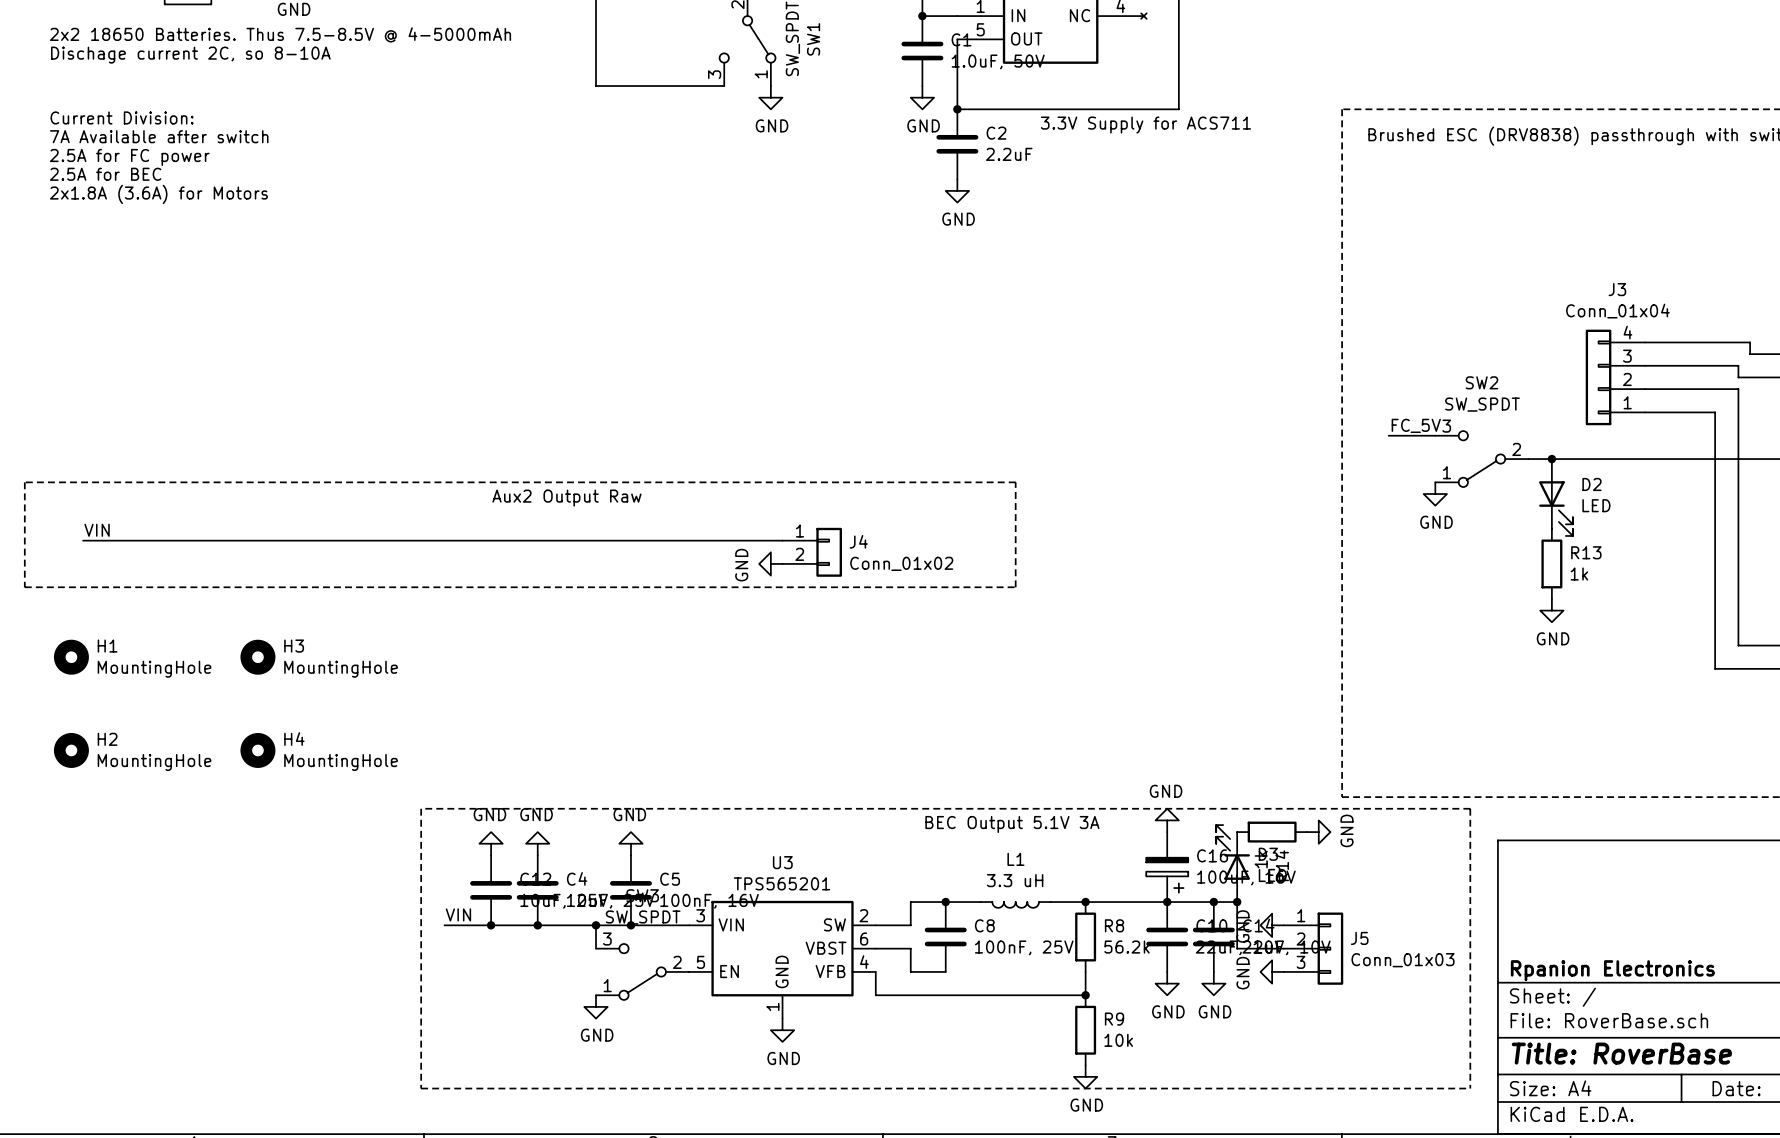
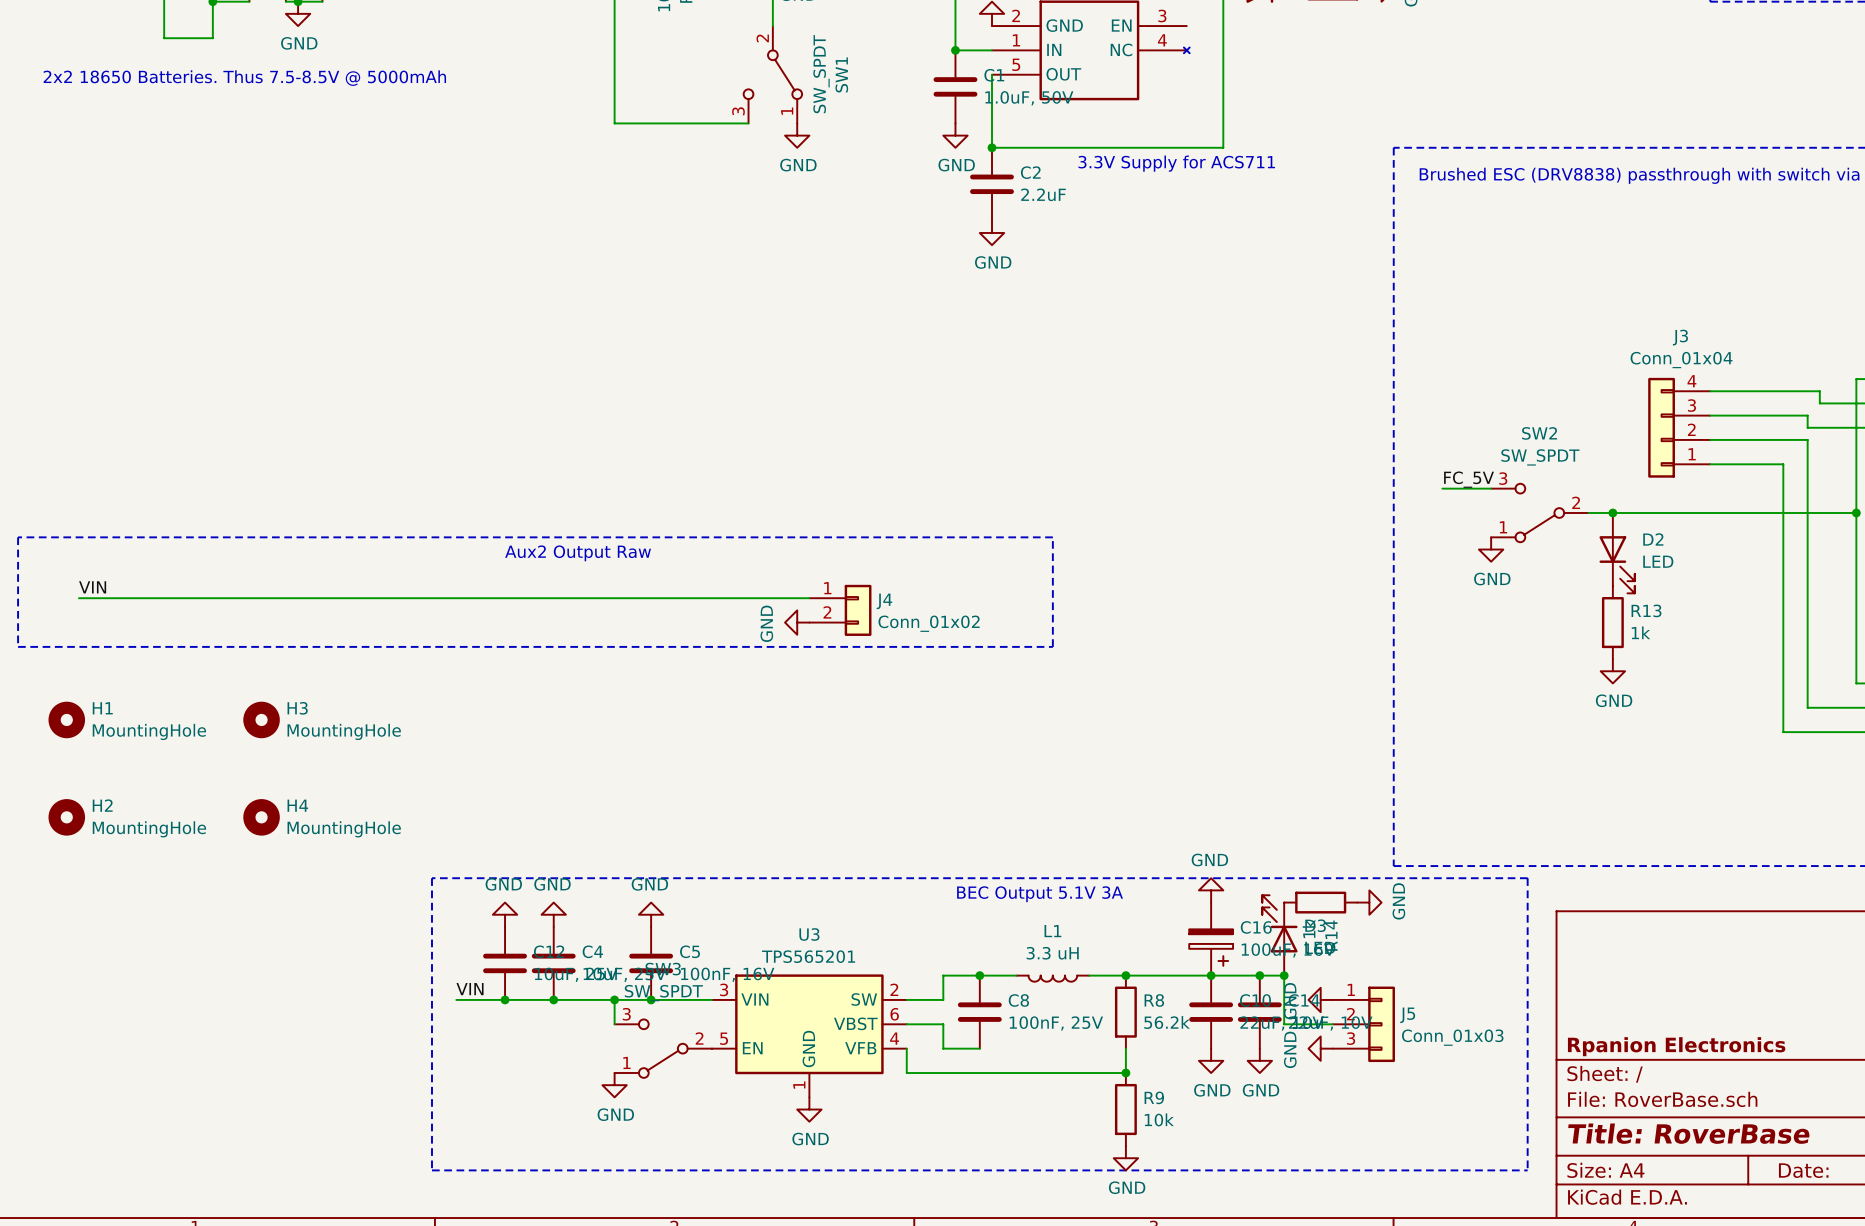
text: 2x2 18650 Batteries. Thus 7.5-8.5V @ 4-5000mAh (280, 34) -> 2x2 18650 Batteries. Thus 7.5-8.5V @ 5000mAh (244, 78)
text: Dischage current 2C, so 8-10A (190, 55) -> none
text: Current Division: (122, 117) -> none
text: 7A Available after switch (159, 136) -> none
text: 2.5A for FC power (129, 157) -> none
text: 2.5A for BEC (105, 174) -> none
text: 2x1.8A (3.6A) for Motors (158, 194) -> none

